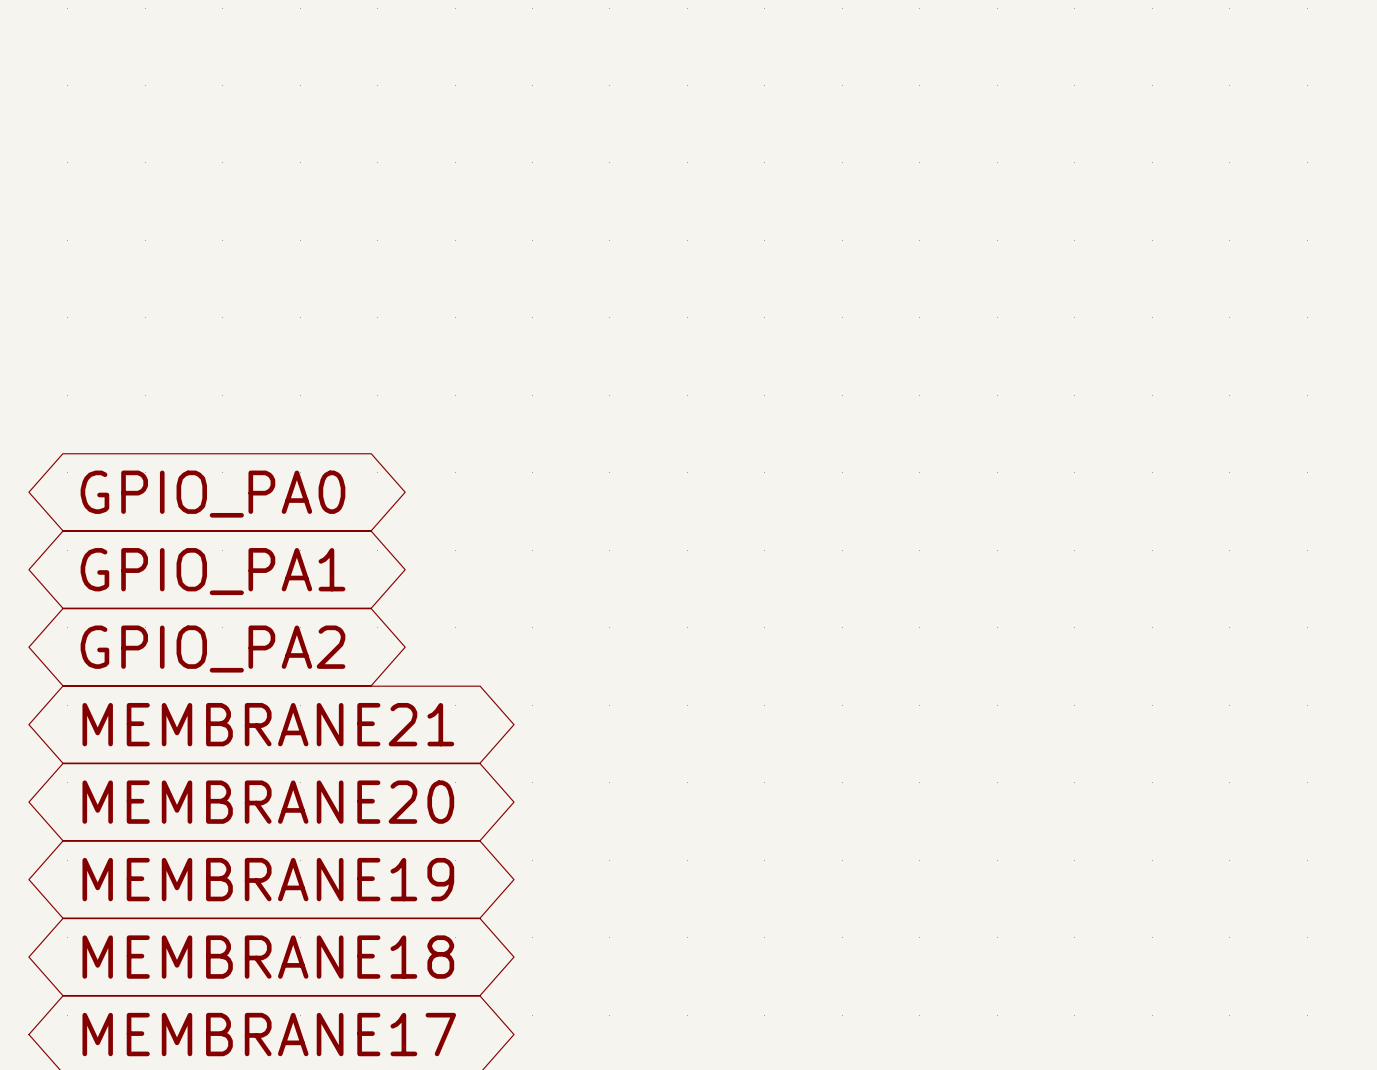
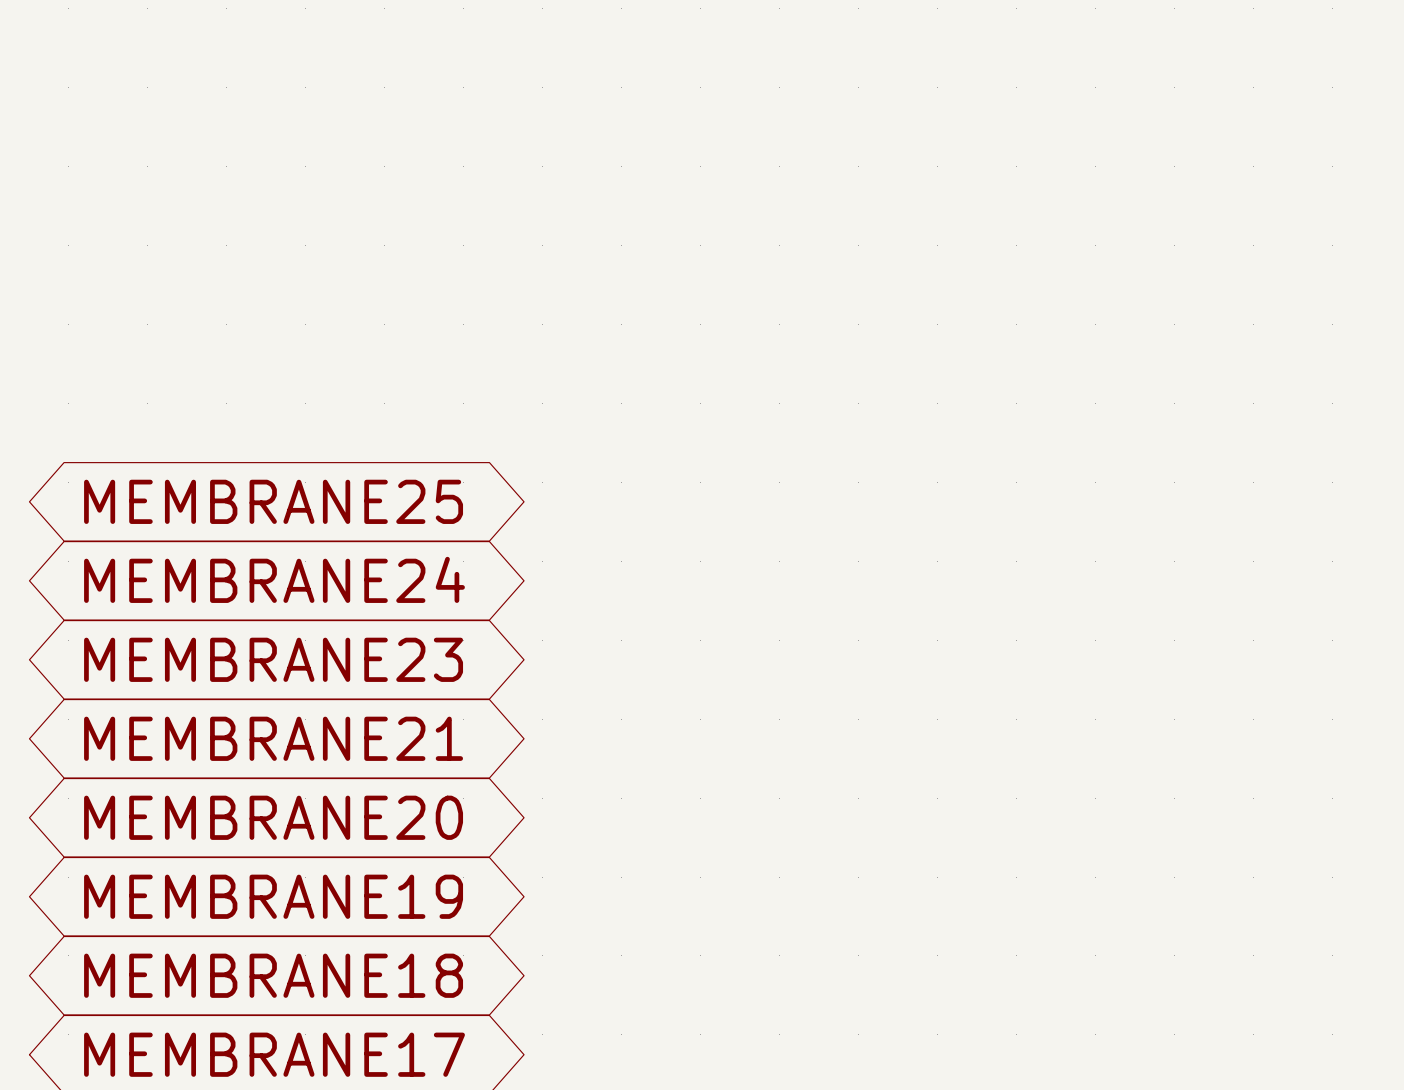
global label: GPIO_PA0 (212, 494) -> MEMBRANE25 (273, 501)
global label: GPIO_PA1 (212, 571) -> MEMBRANE24 (274, 579)
global label: GPIO_PA2 (212, 649) -> MEMBRANE23 (273, 659)

